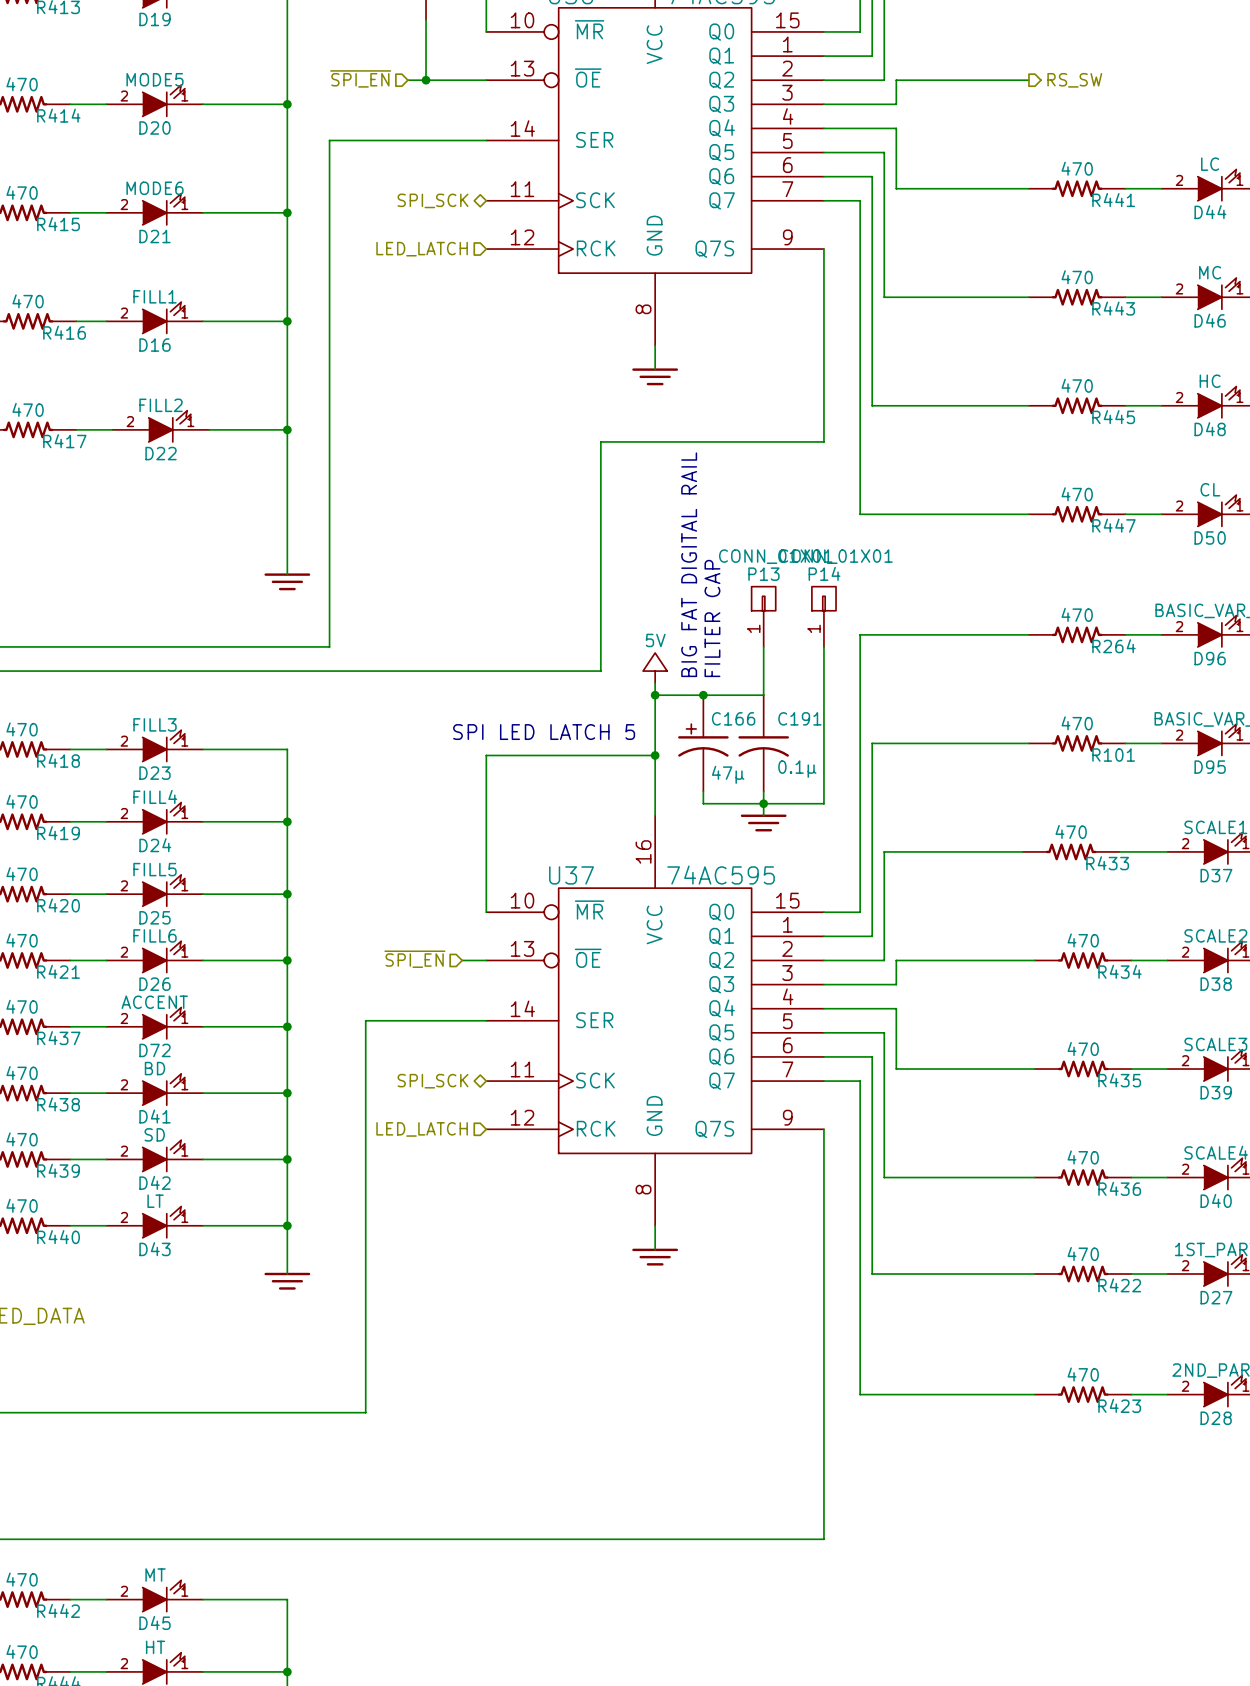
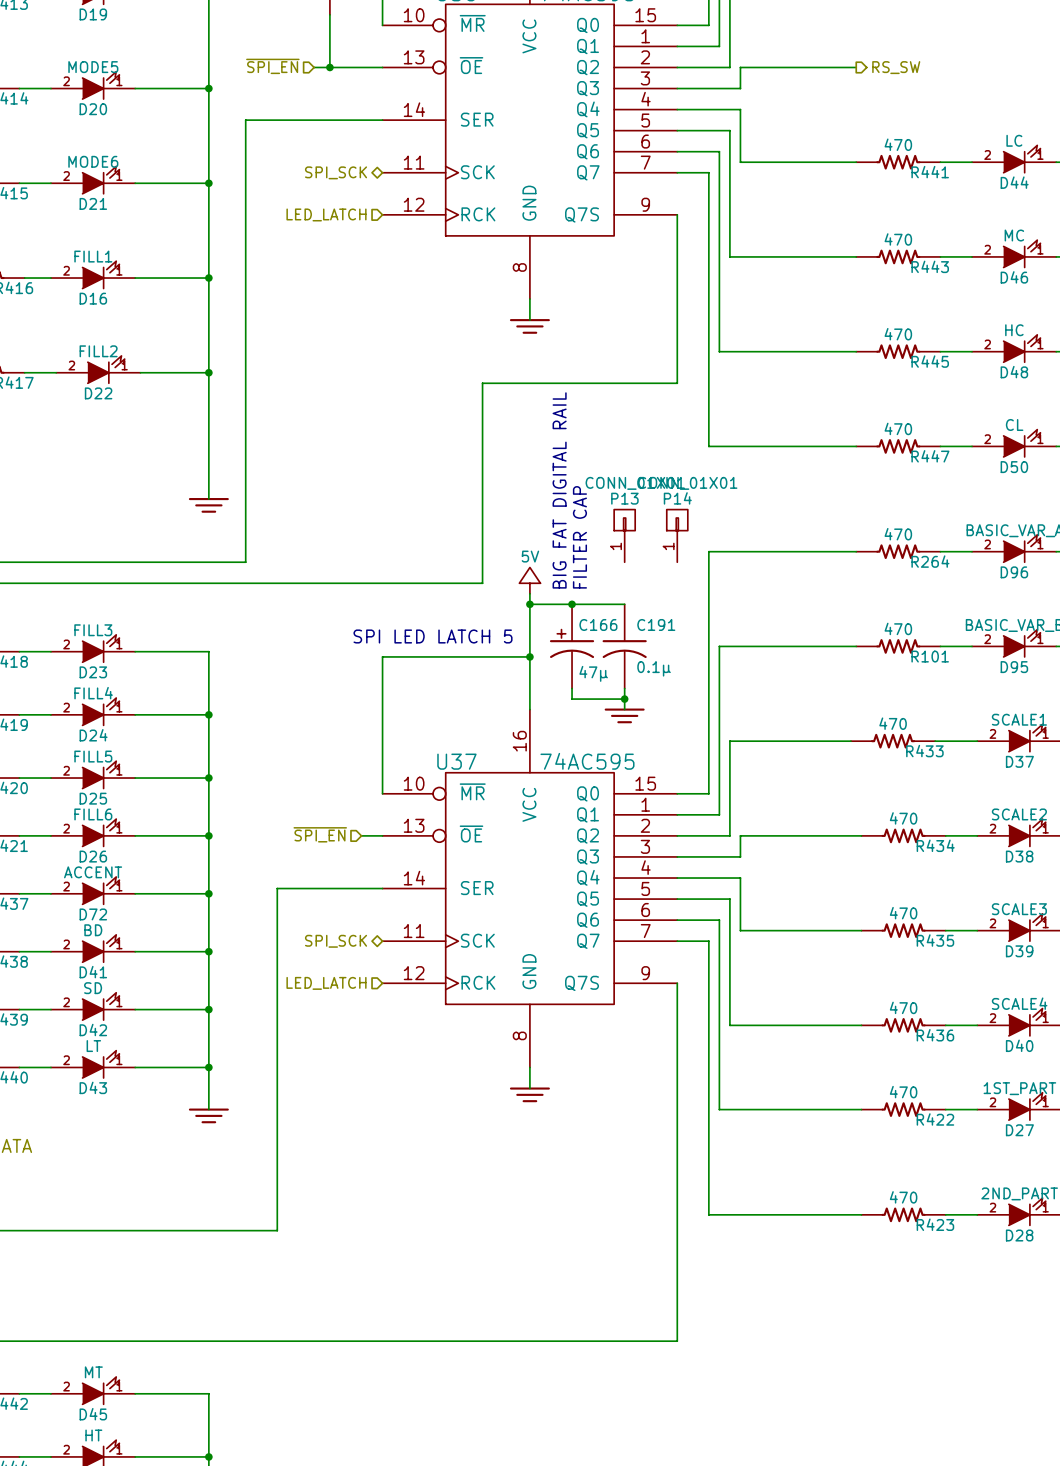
wire: (763, 646) (763, 695) -> none
wire: (823, 646) (823, 803) (763, 803) -> none

